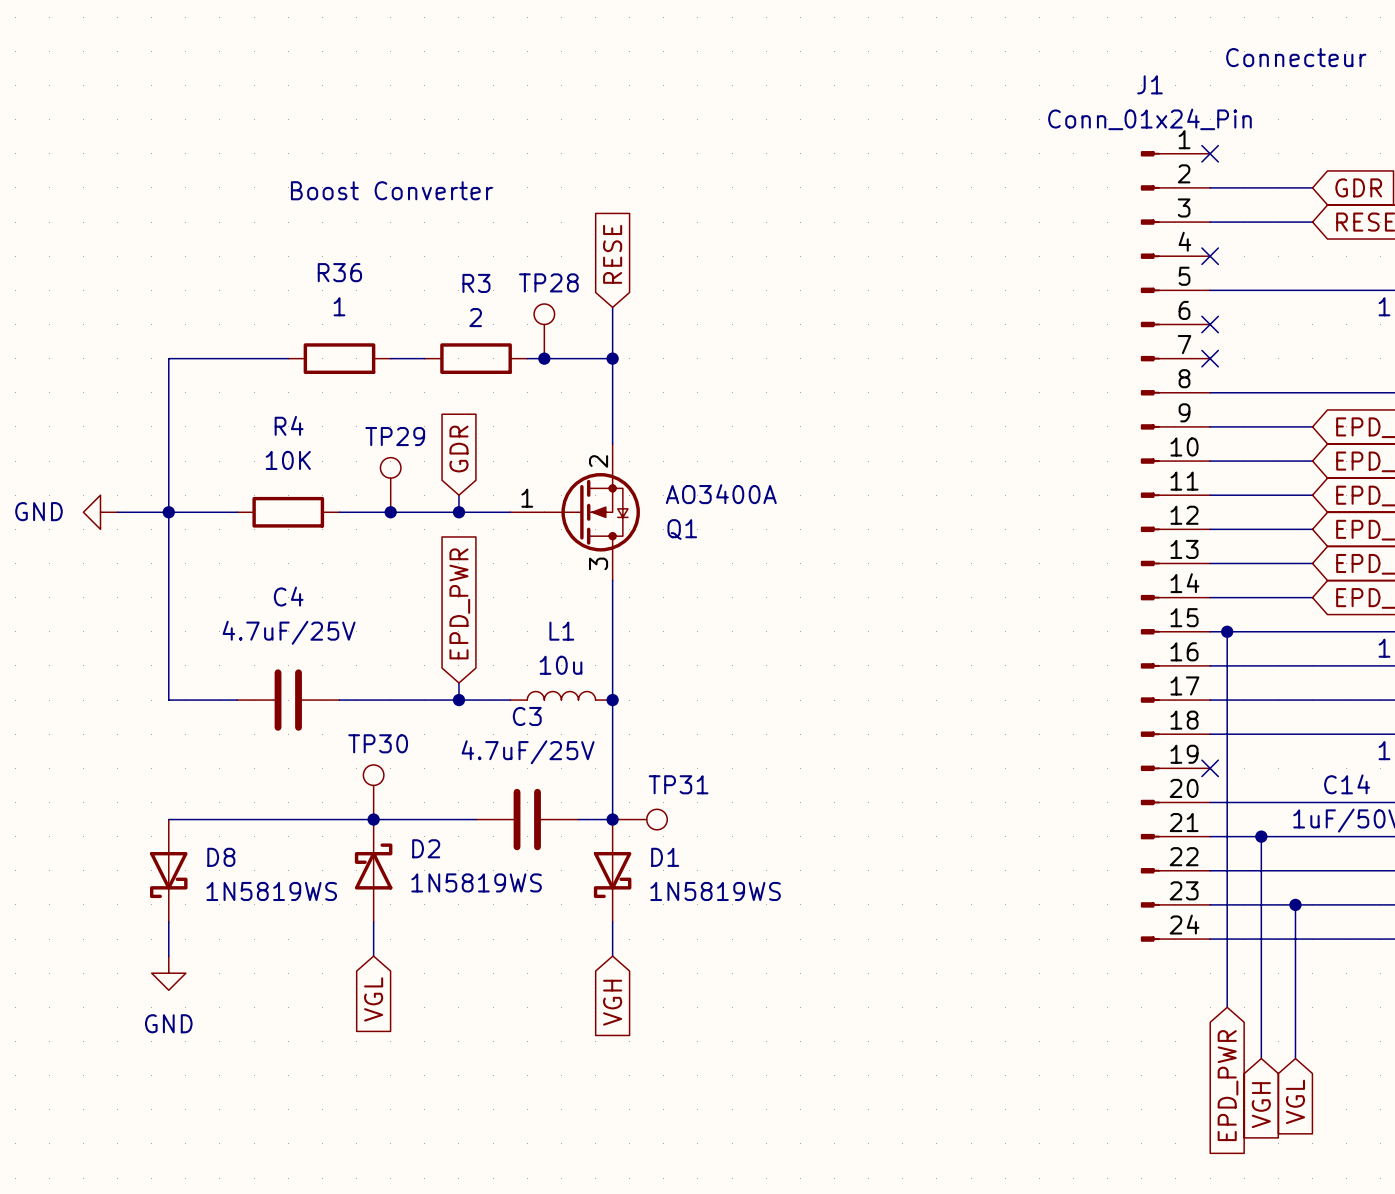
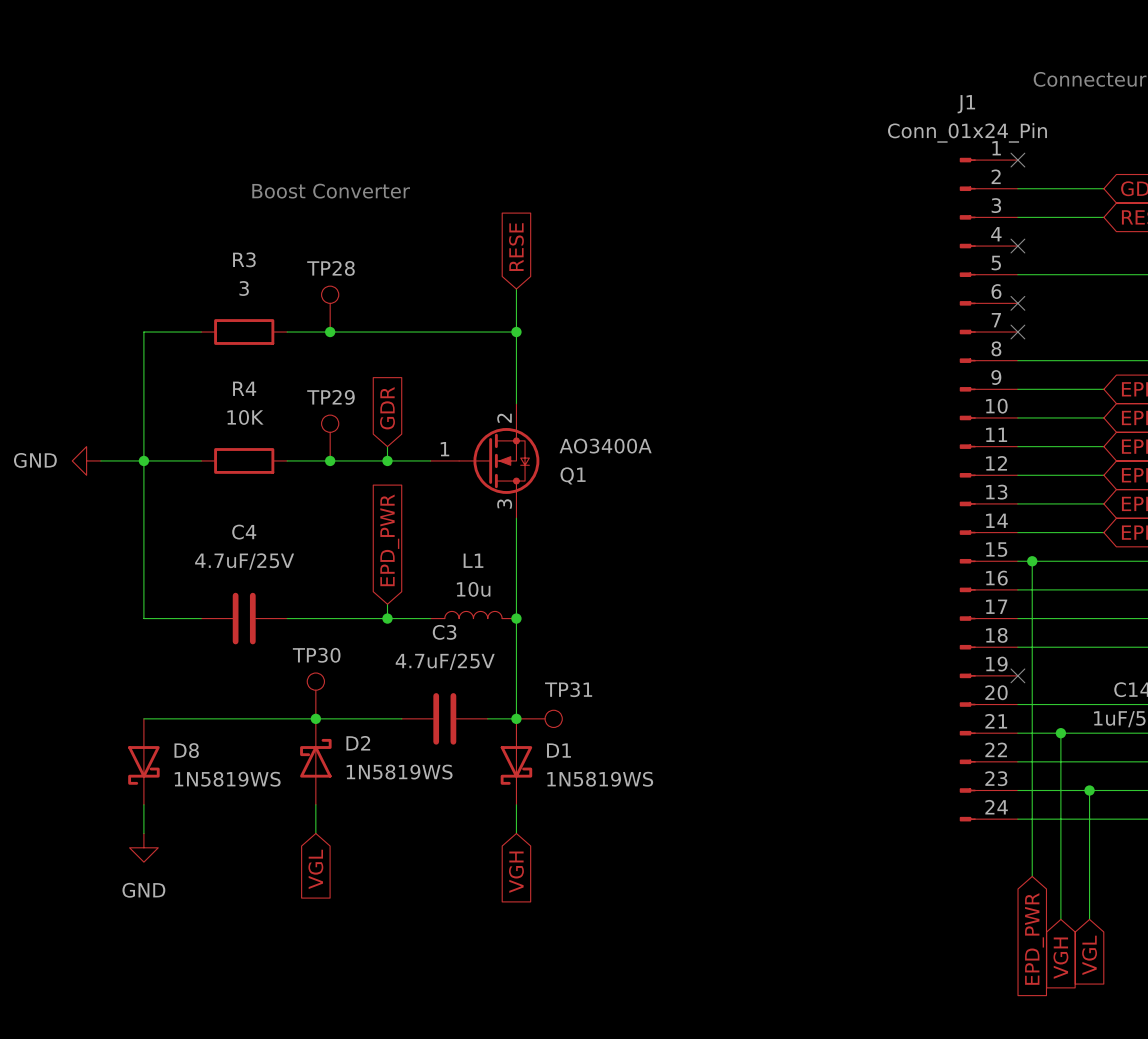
R3 name position: R3 (476, 283) -> R3 (244, 259)
R3 value: 2 (475, 317) -> 3 (244, 288)
TP28 position: (544, 331) -> (330, 309)
wire: (237, 358) (288, 358) -> (287, 332) (330, 332)
R36: 1 (339, 358) -> none
junction: none -> (330, 332)
wire: none -> (358, 332) (444, 332)
R3 position: (476, 358) -> (244, 332)
junction: (544, 358) -> none

